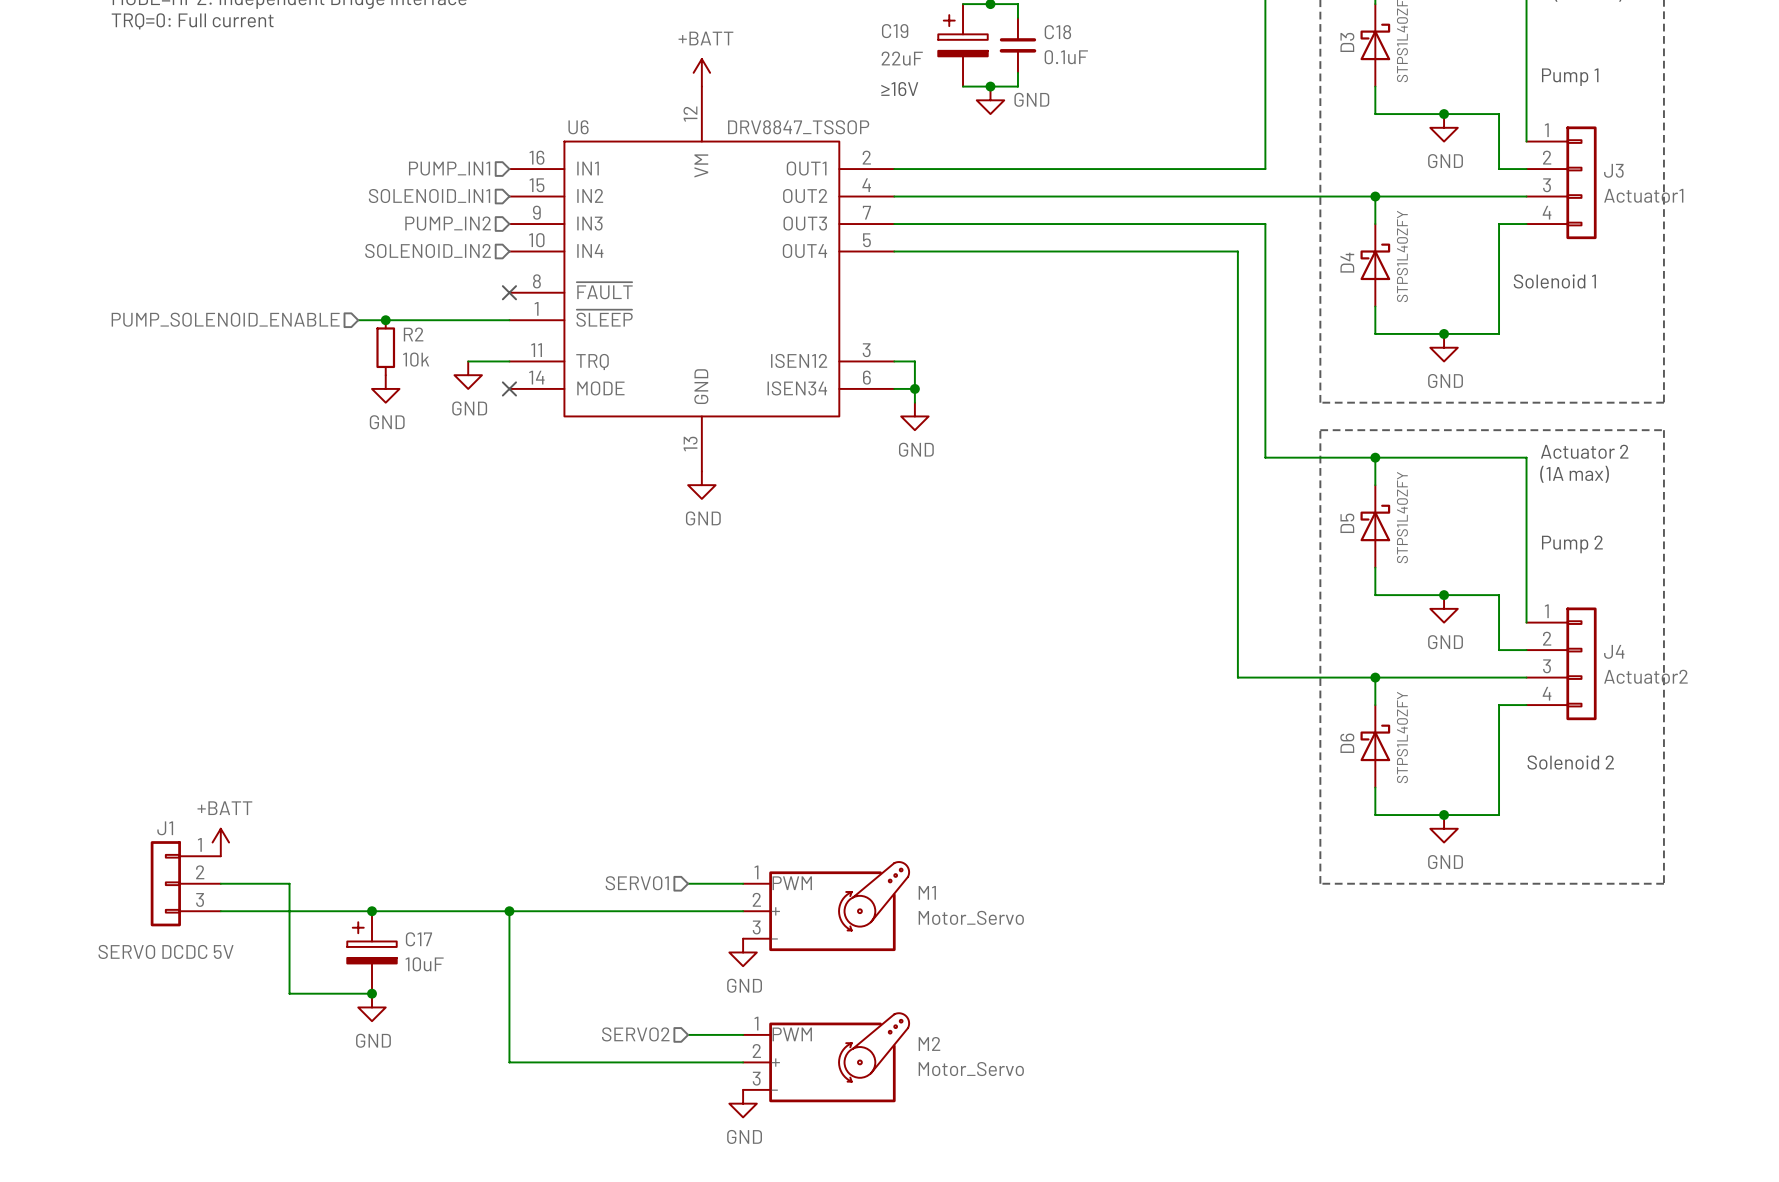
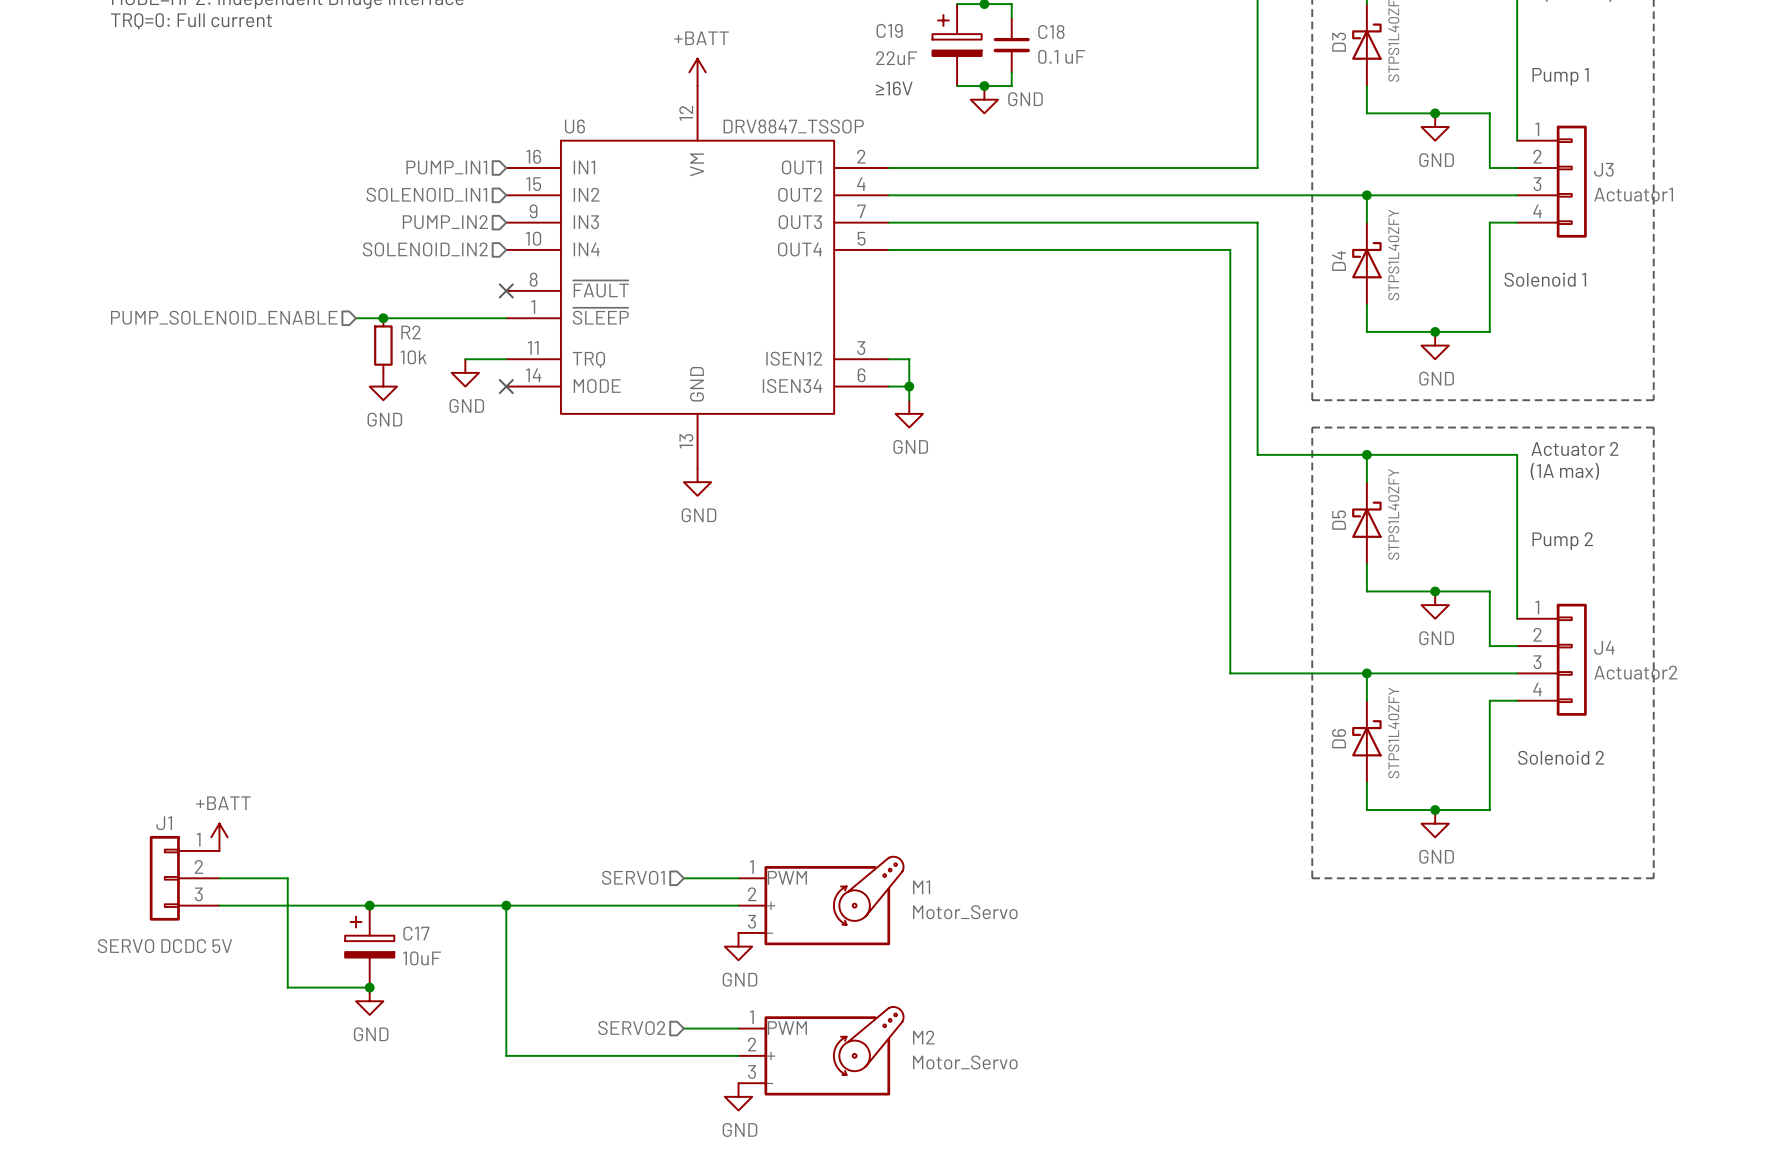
C18 value: 0.1uF (1066, 57) -> 0.1 uF (1061, 56)

